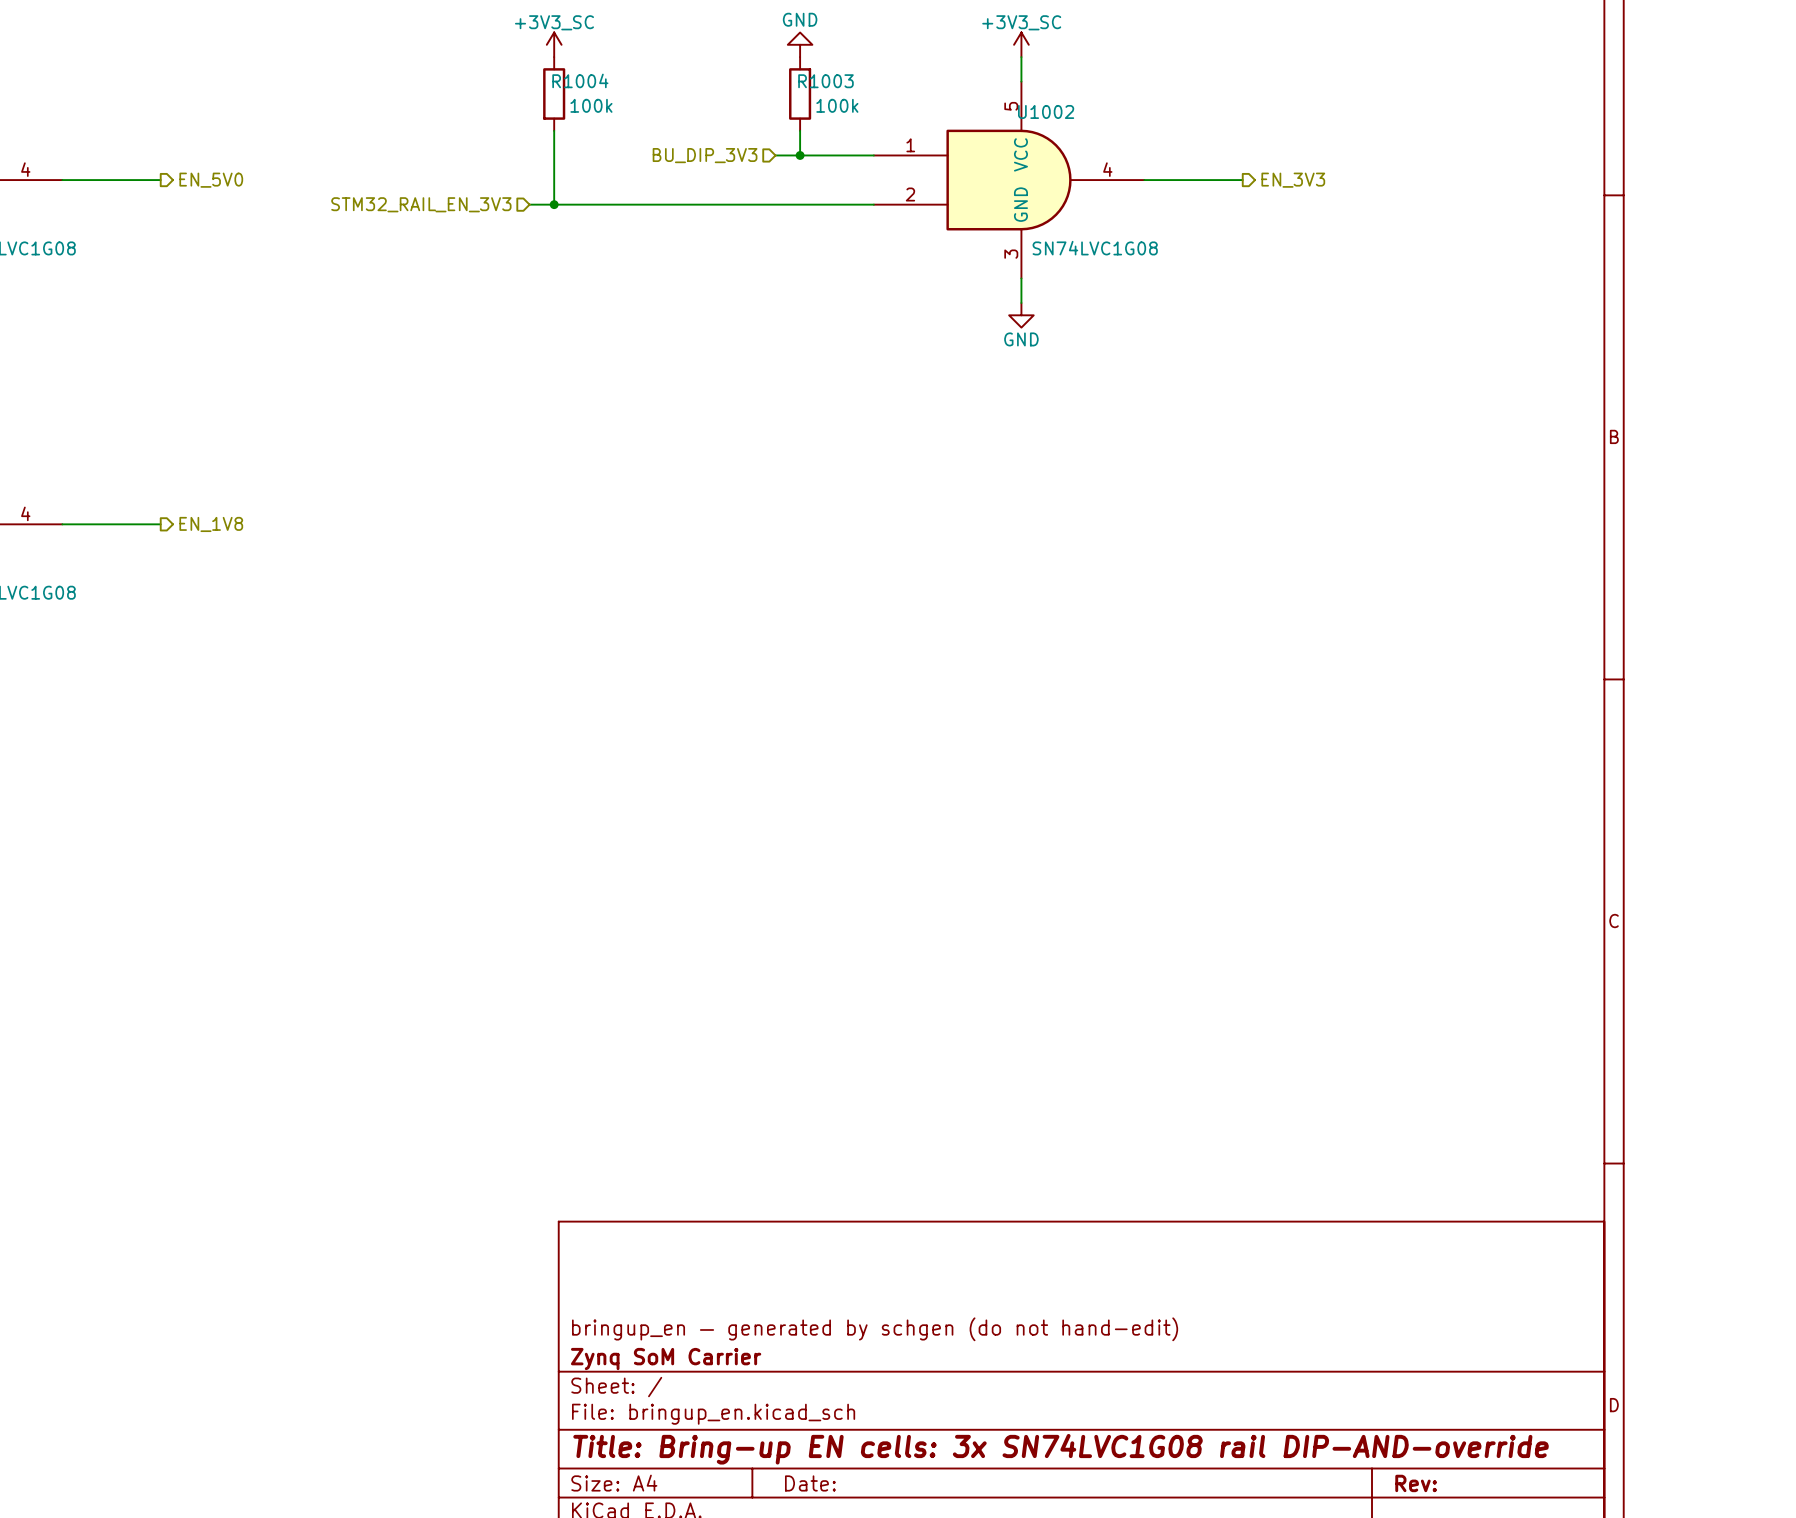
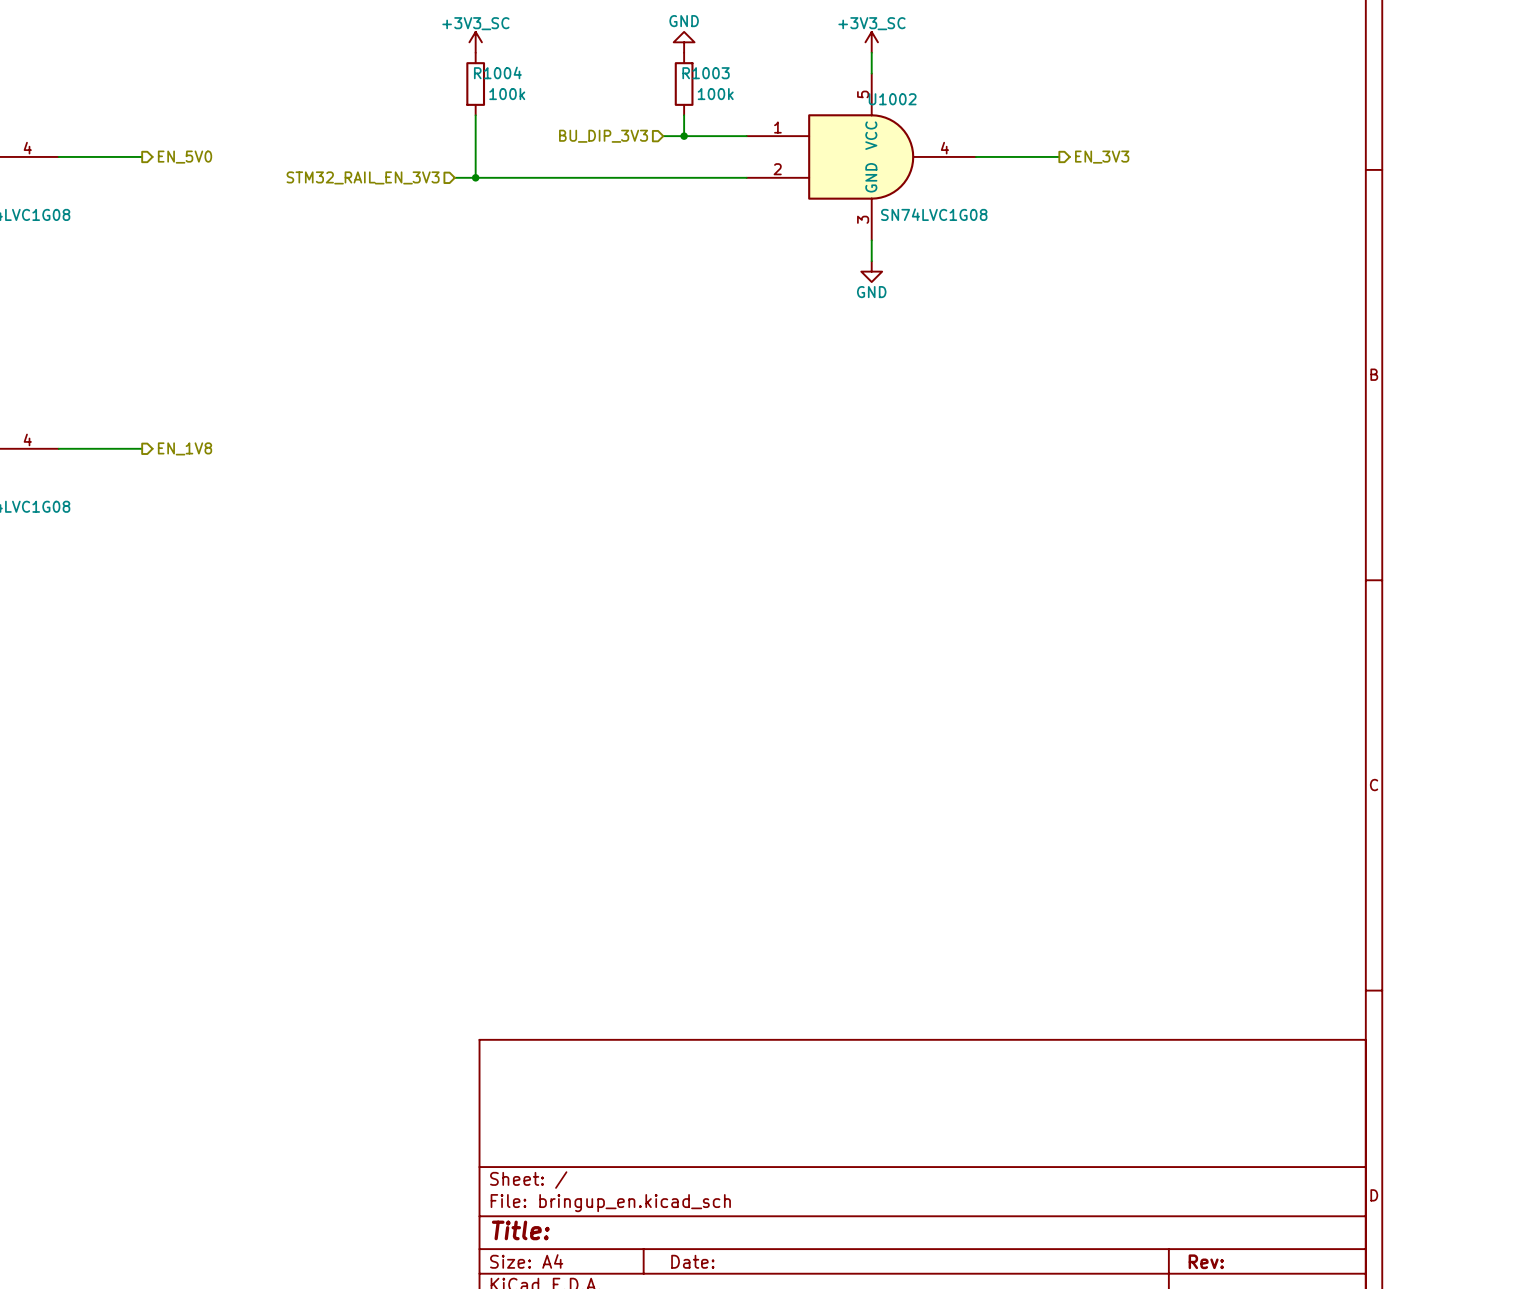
title block: bringup_en — generated by schgen (do not hand-edit) (875, 1329) -> none
title block: Zynq SoM Carrier (666, 1359) -> none
title block: Title: Bring-up EN cells: 3x SN74LVC1G08 rail DIP-AND-override (1061, 1449) -> Title: (520, 1230)

